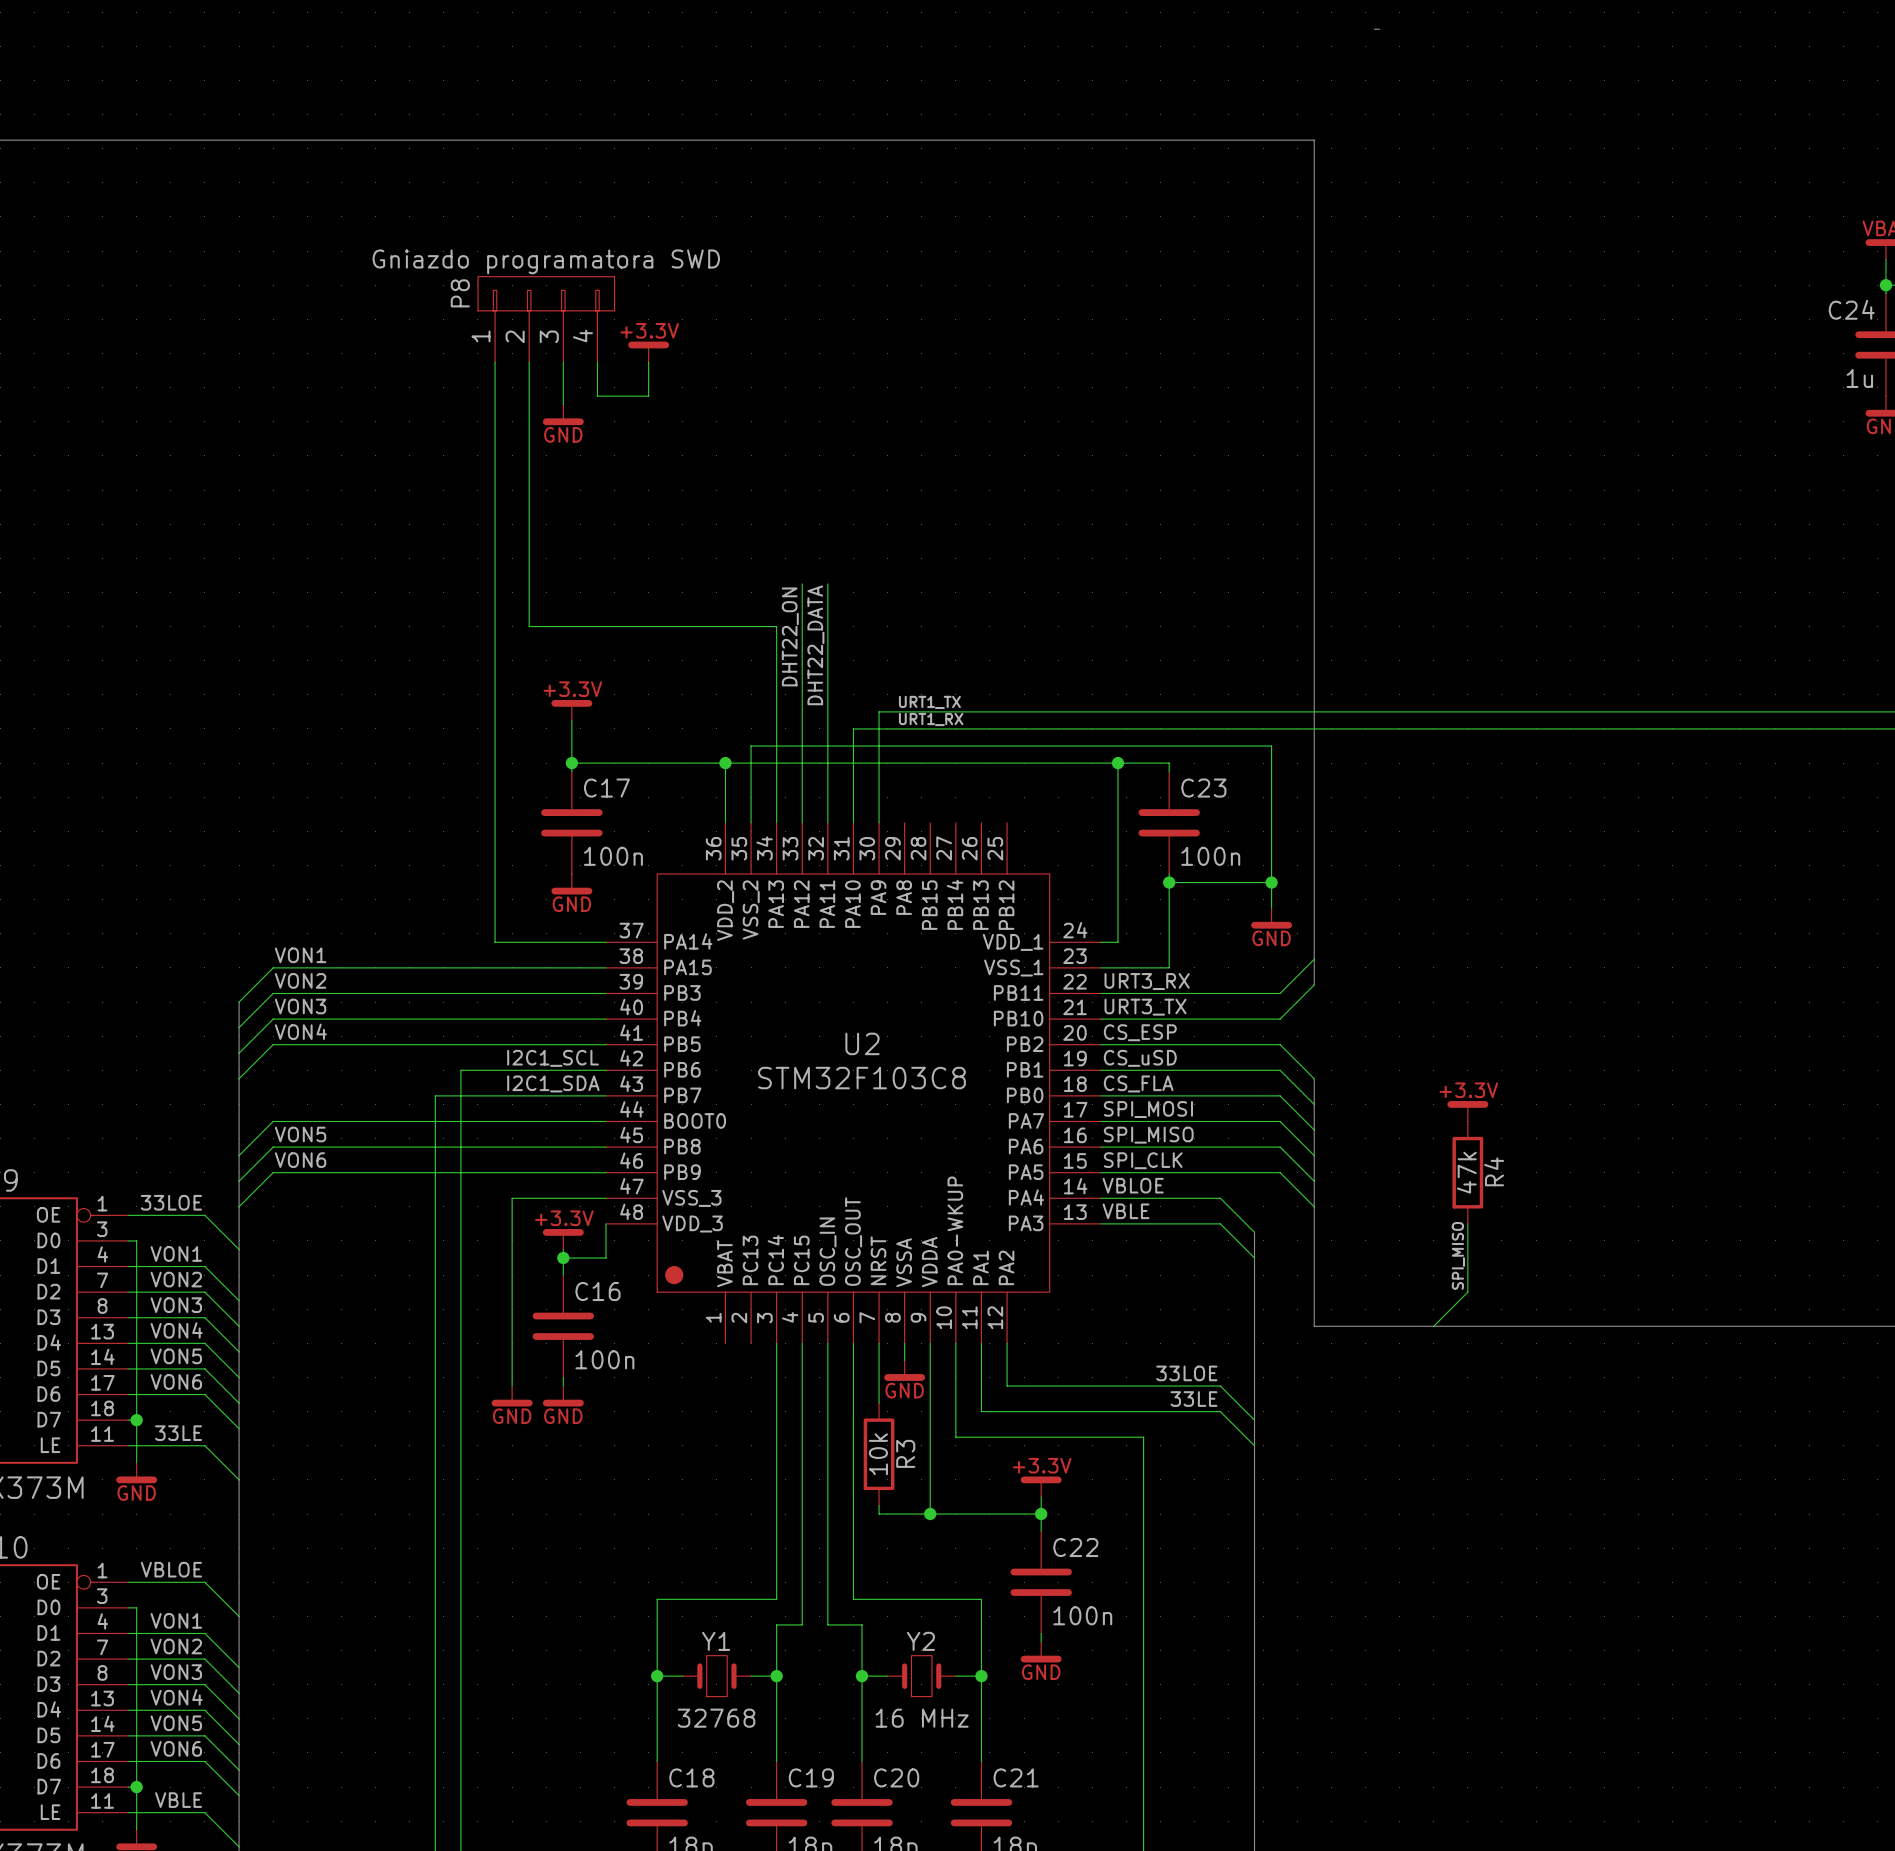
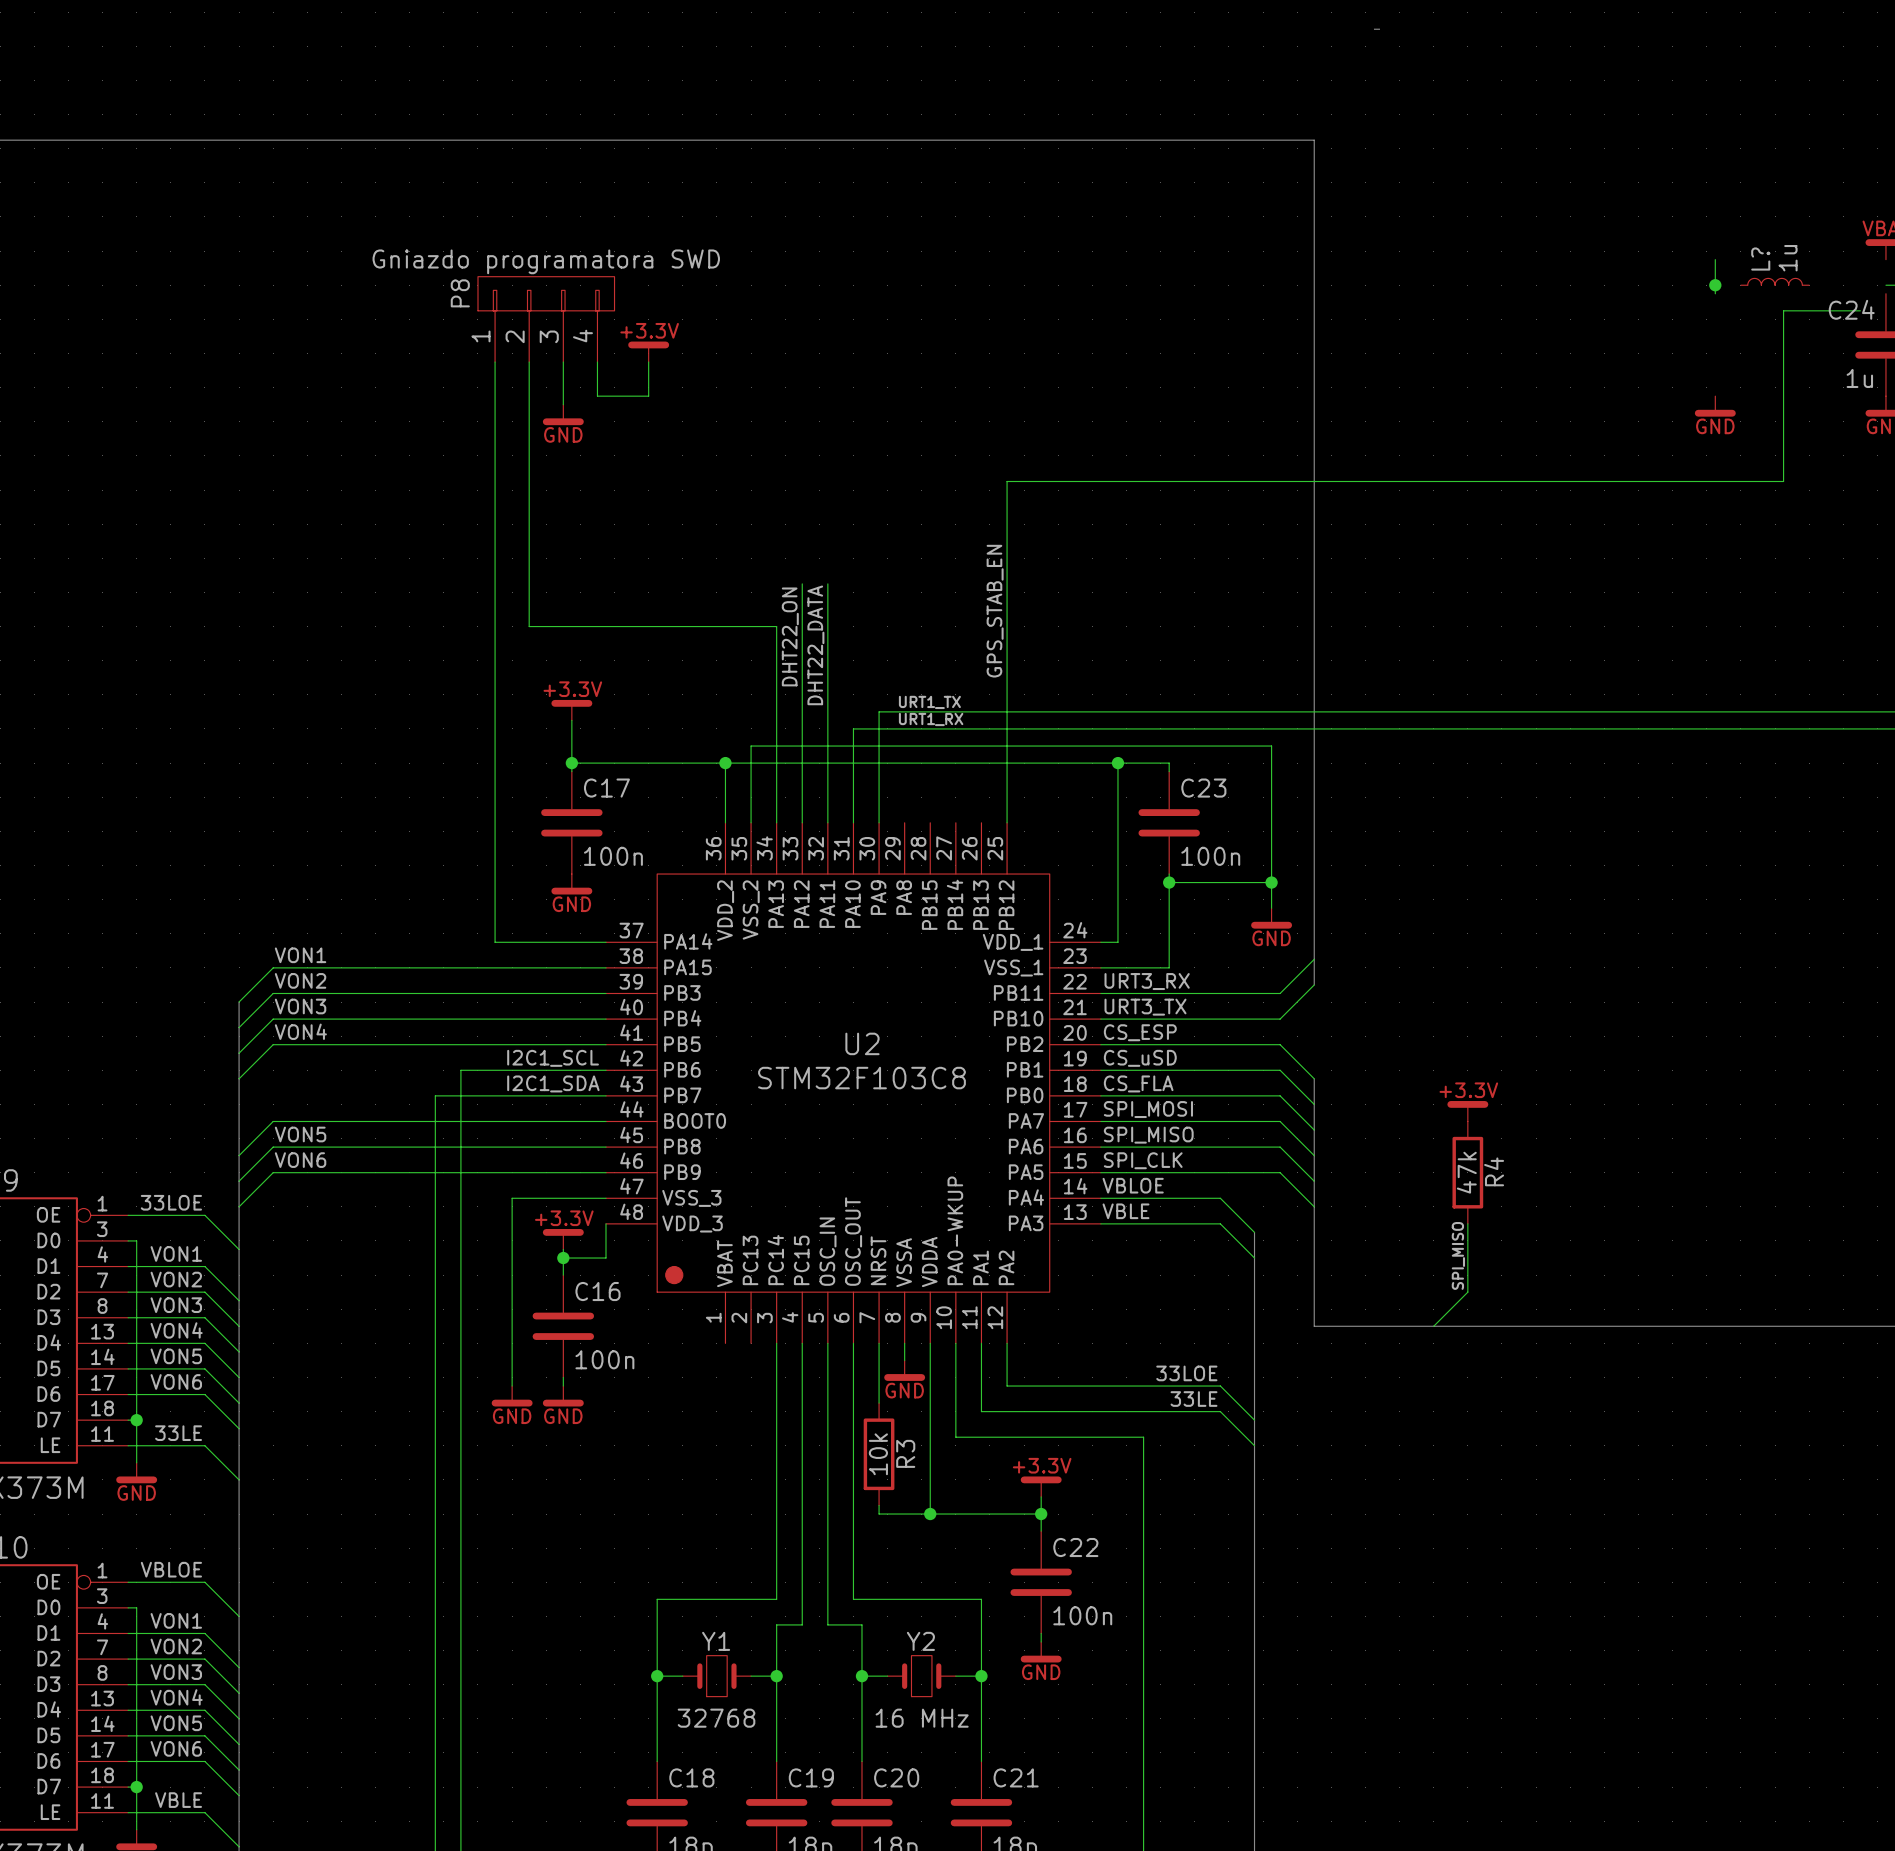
wire: (1885, 259) (1885, 293) -> (1715, 259) (1715, 293)
L?: none -> 1u (1775, 281)
junction: none -> (1715, 285)
junction: (1885, 285) -> none
wire: none -> (1860, 310) (1783, 310) (1783, 481) (1007, 481) (1007, 822)
power symbol: none -> (1715, 406)
label: none -> GPS_STAB_EN (995, 611)

